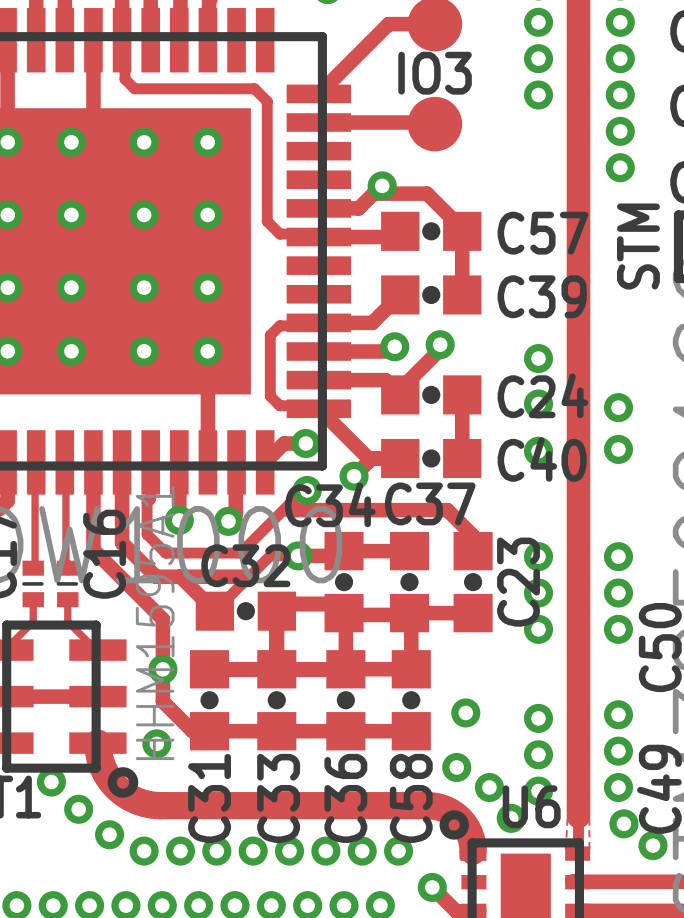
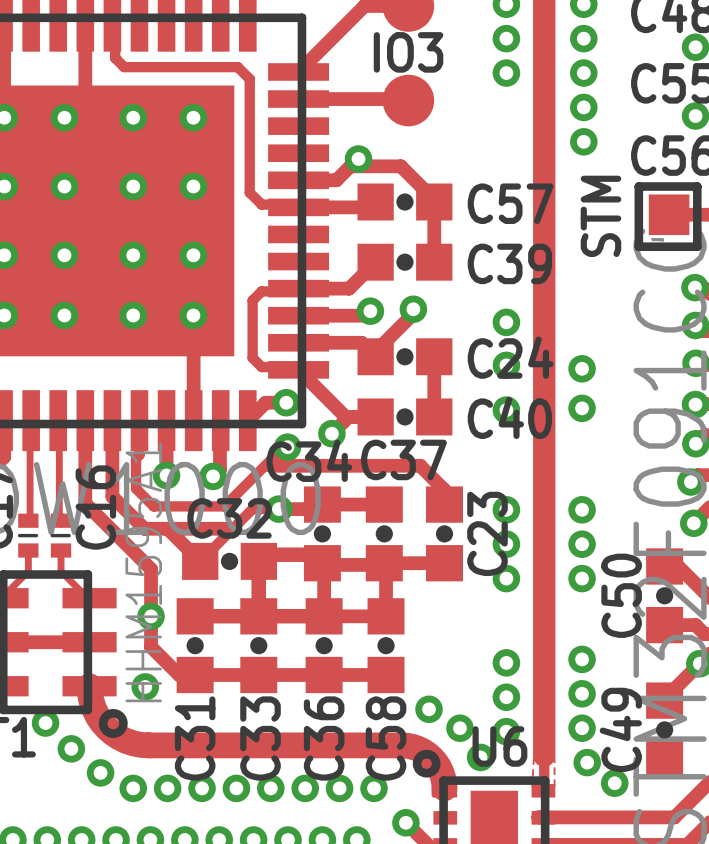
via: (465, 712) -> none

